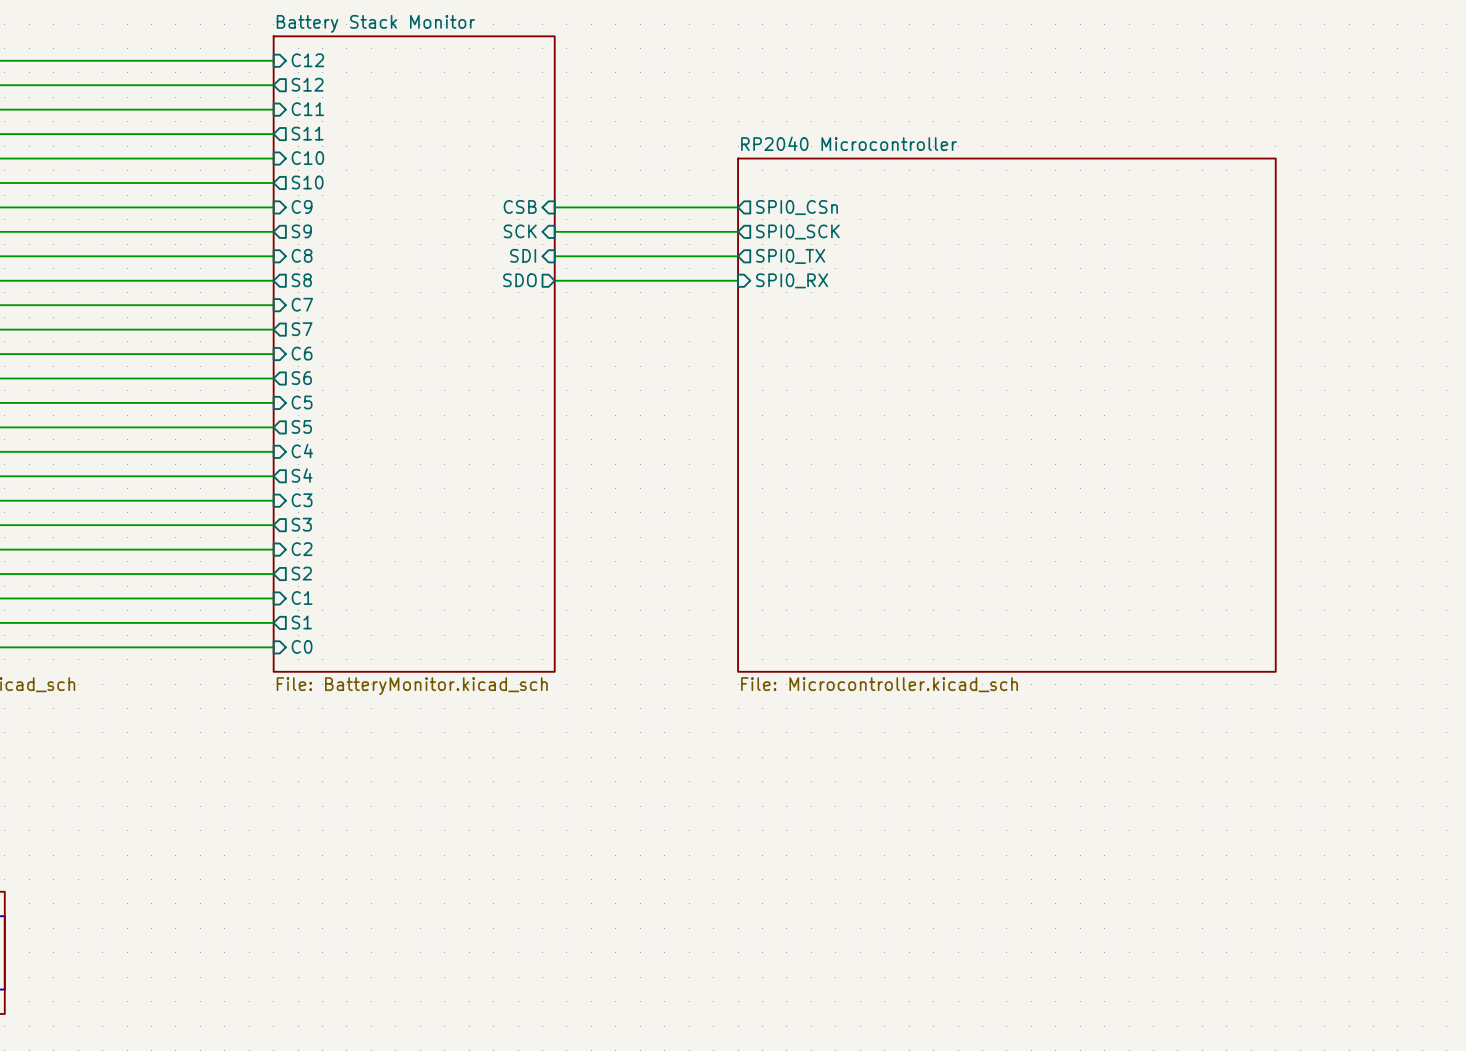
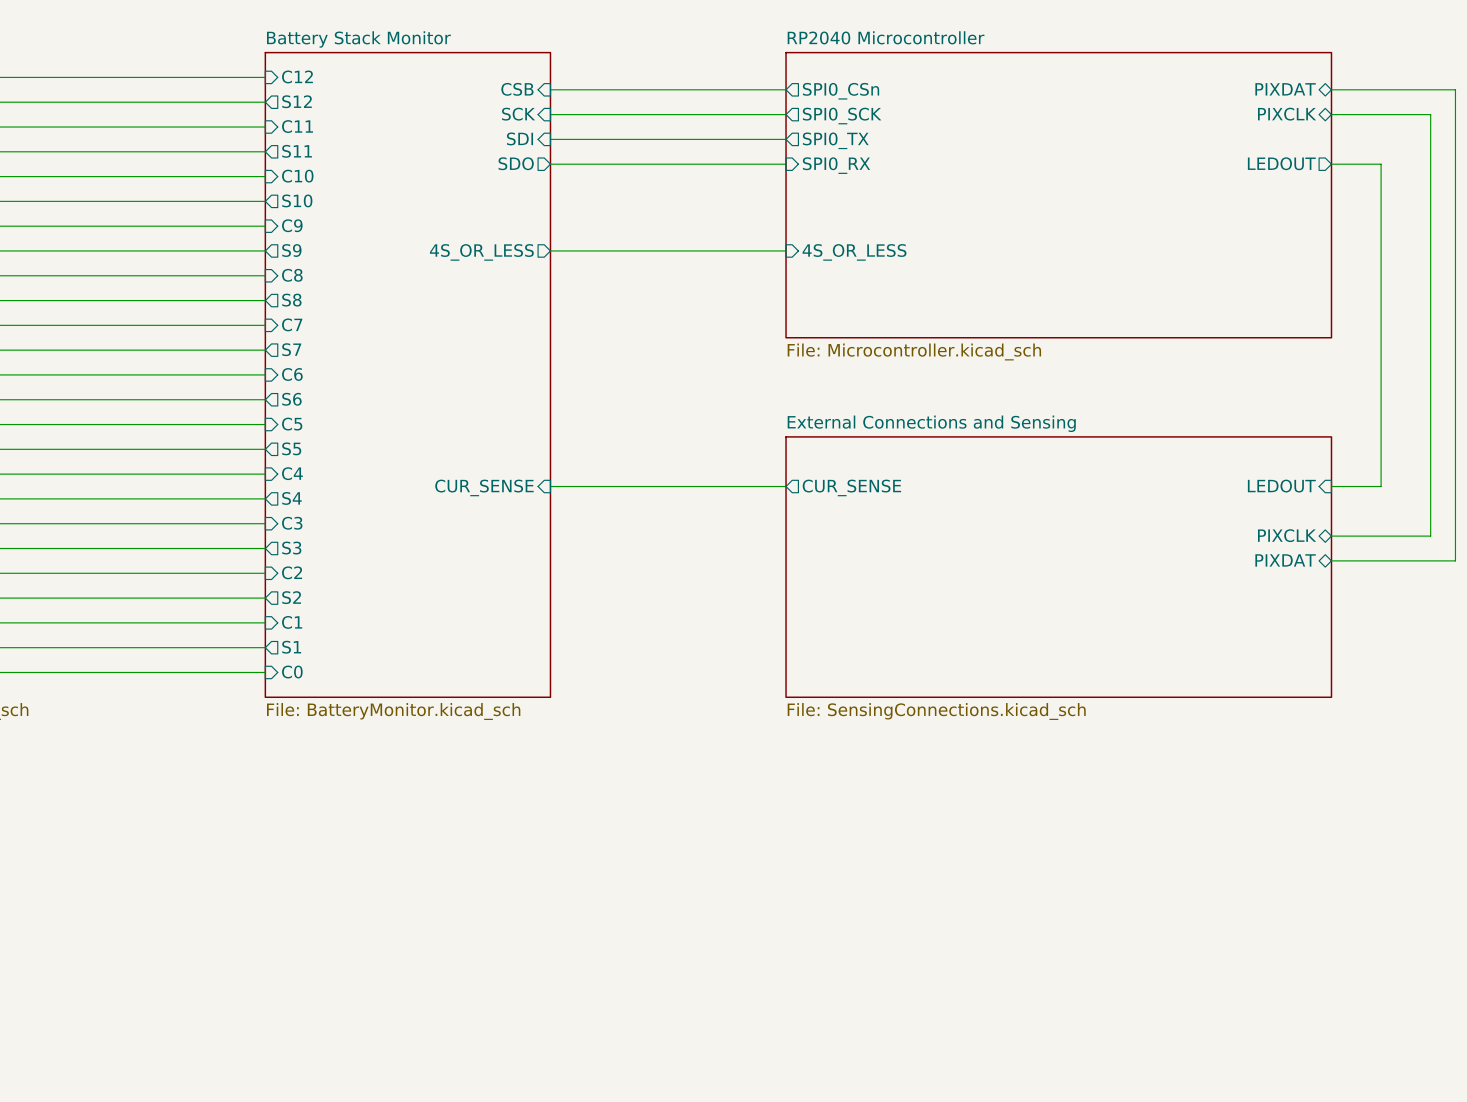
wire: none -> (550, 89) (786, 89)
sheet pin: none -> PIXDAT (1285, 89)
wire: none -> (1331, 89) (1455, 89) (1455, 560) (1331, 560)
sheet pin: none -> SCK (518, 114)
sheet pin: none -> PIXCLK (1287, 114)
wire: none -> (550, 114) (786, 114)
wire: none -> (1331, 114) (1430, 114) (1430, 536) (1331, 536)
wire: none -> (550, 139) (786, 139)
sheet RP2040 Microcontroller name position: RP2040 Microcontroller (848, 143) -> RP2040 Microcontroller (886, 37)
sheet pin: none -> LEDOUT (1281, 163)
wire: none -> (550, 164) (786, 164)
wire: none -> (1331, 164) (1381, 164) (1381, 486) (1331, 486)
sheet RP2040 Microcontroller shape: [737, 157, 1277, 673] -> [785, 51, 1333, 339]
sheet pin position: CSB (520, 206) -> CSB (517, 89)
wire: (554, 207) (738, 207) -> none
sheet pin position: SPI0_CSn (797, 207) -> SPI0_CSn (841, 91)
sheet pin shape: input (520, 231) -> output (481, 252)
sheet pin: SCK (520, 231) -> 4S_OR_LESS (481, 252)
wire: none -> (736, 250) (786, 250)
sheet pin position: SPI0_SCK (797, 231) -> SPI0_SCK (842, 116)
sheet pin: none -> 4S_OR_LESS (854, 252)
sheet pin position: SDI (523, 255) -> SDI (520, 138)
wire: (554, 256) (738, 256) -> none
sheet pin position: SPI0_TX (790, 256) -> SPI0_TX (835, 140)
sheet pin position: SDO (519, 280) -> SDO (516, 163)
wire: (554, 280) (738, 280) -> none
sheet pin position: SPI0_RX (792, 280) -> SPI0_RX (836, 165)
sheet pin: none -> LEDOUT (1281, 486)
sheet pin: none -> CUR_SENSE (484, 487)
wire: none -> (550, 486) (786, 486)
sheet pin: none -> CUR_SENSE (851, 487)
sheet pin: none -> PIXCLK (1287, 535)
sheet pin: none -> PIXDAT (1285, 560)
sheet External Connections and Sensing: none -> File: SensingConnections.kicad_sch (1058, 567)
sheet RP2040 Microcontroller value position: File: Microcontroller.kicad_sch (879, 684) -> File: Microcontroller.kicad_sch (914, 351)

